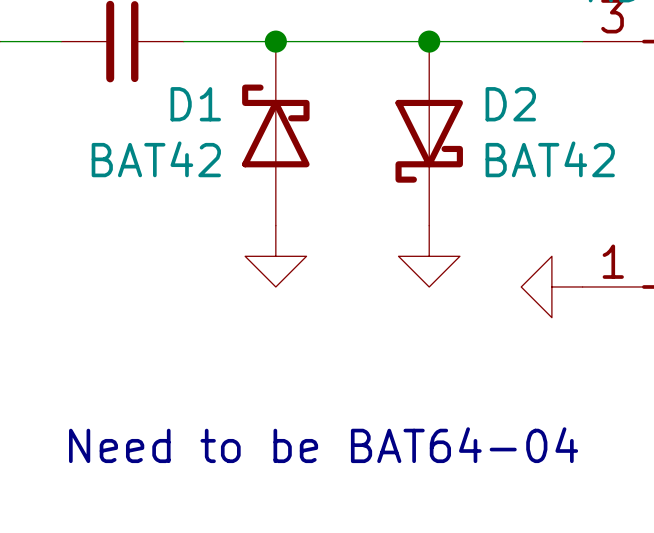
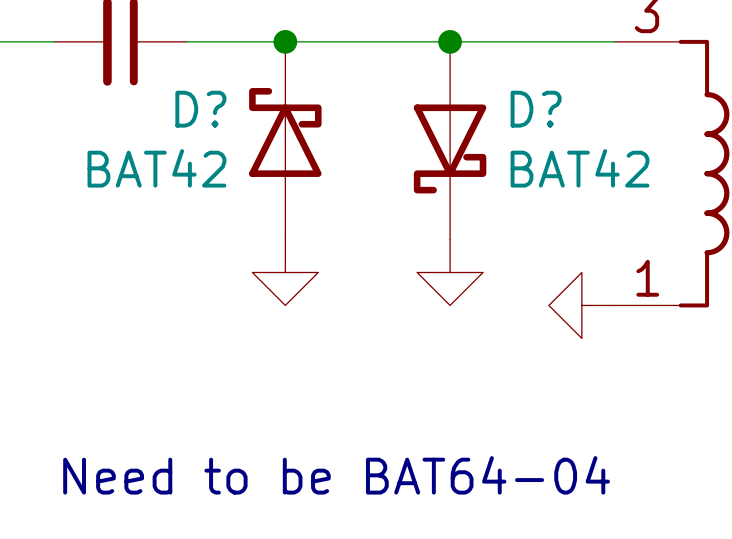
D1 name: D1 (195, 104) -> D? (200, 109)
D2 name: D2 (510, 104) -> D? (536, 109)

